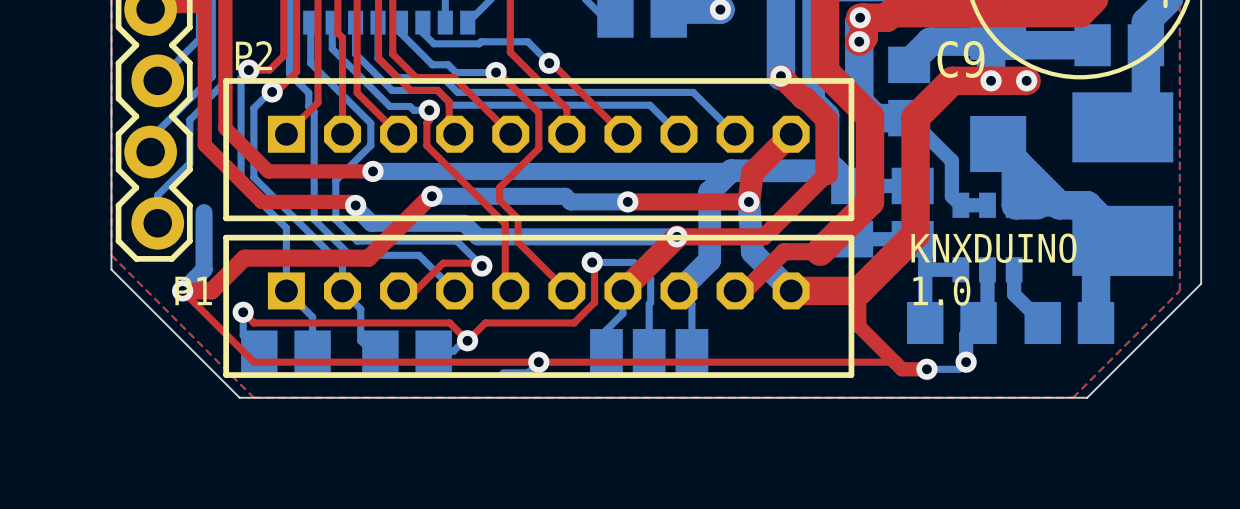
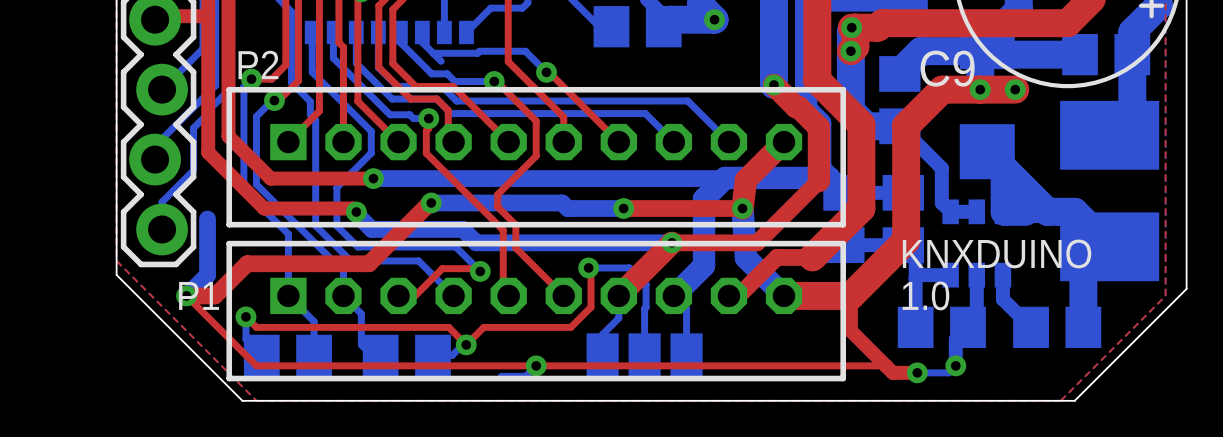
bottom track: none -> (433, 53) (441, 61)

